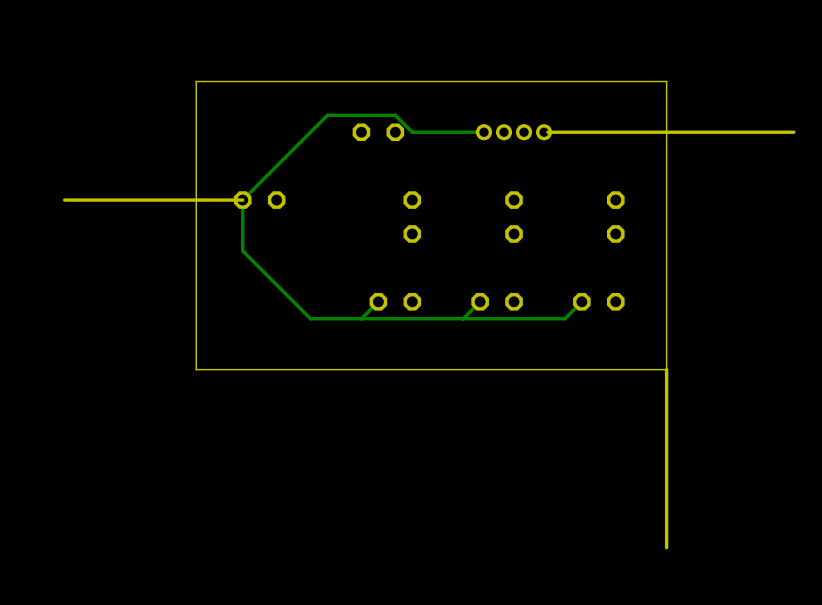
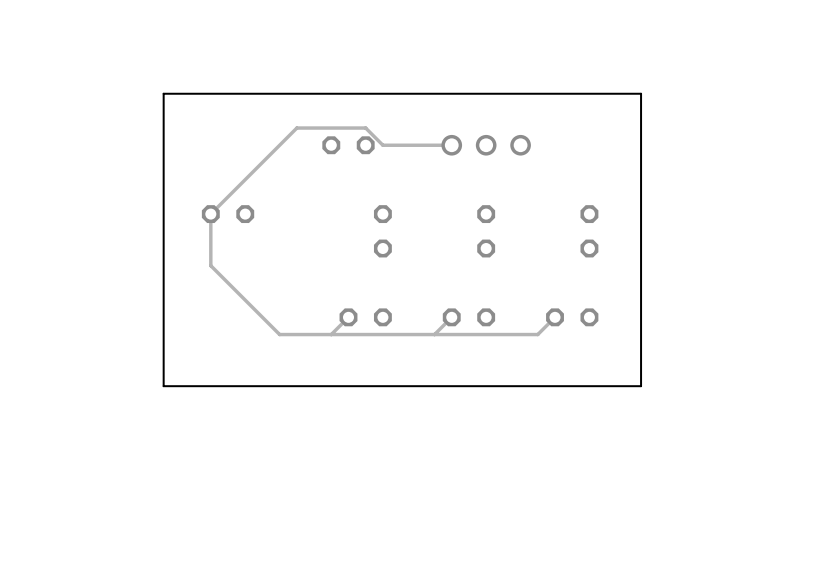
part footprint: [475, 124, 553, 141] -> [441, 134, 531, 156]
board edge: (793, 132) (547, 132) -> none
board edge: (242, 200) (64, 200) -> none
board edge: (666, 369) (666, 547) -> none

